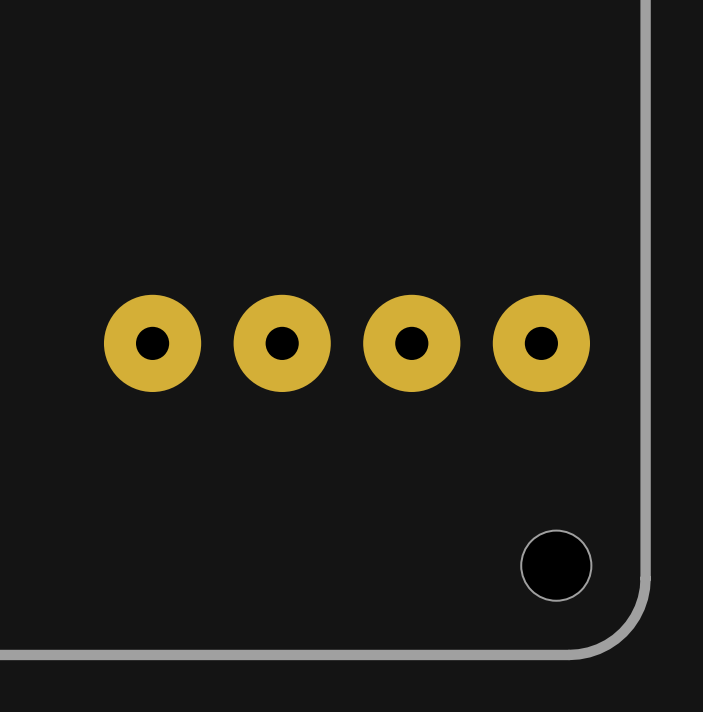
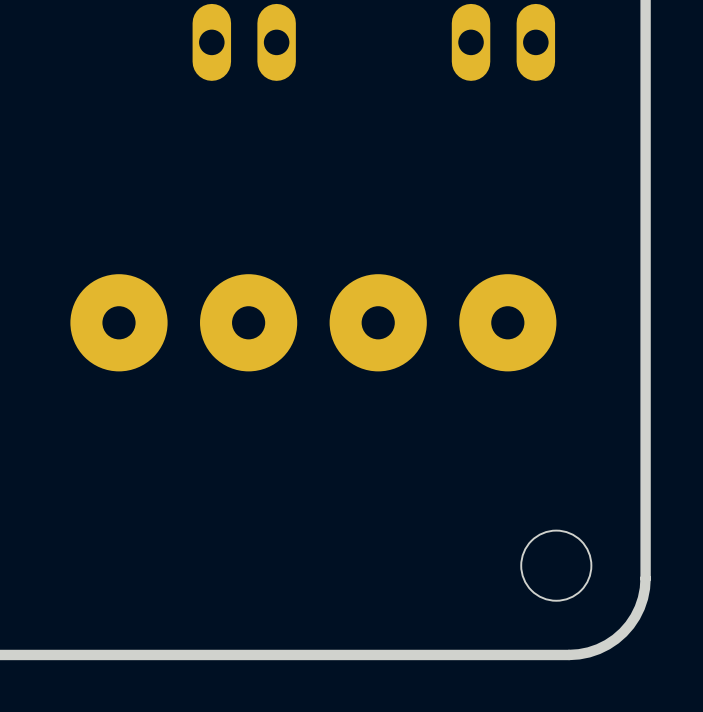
part: none -> (244, 42)
part: none -> (503, 42)
part position: (346, 343) -> (313, 322)

